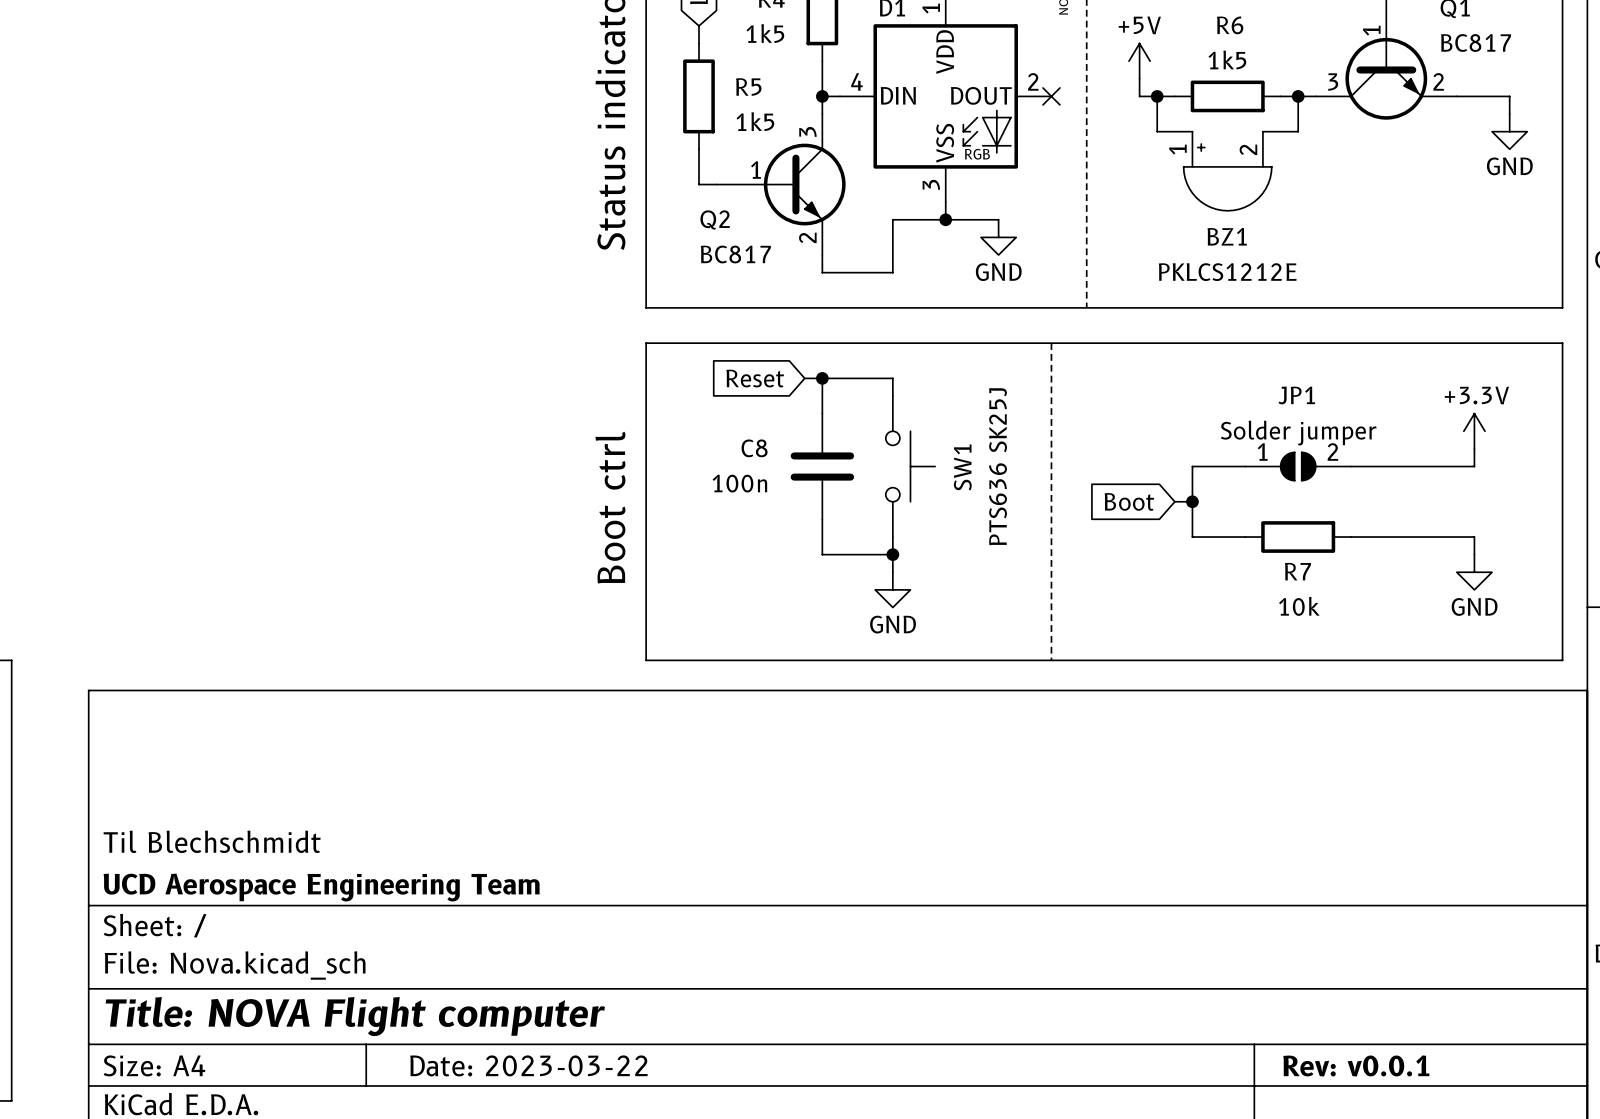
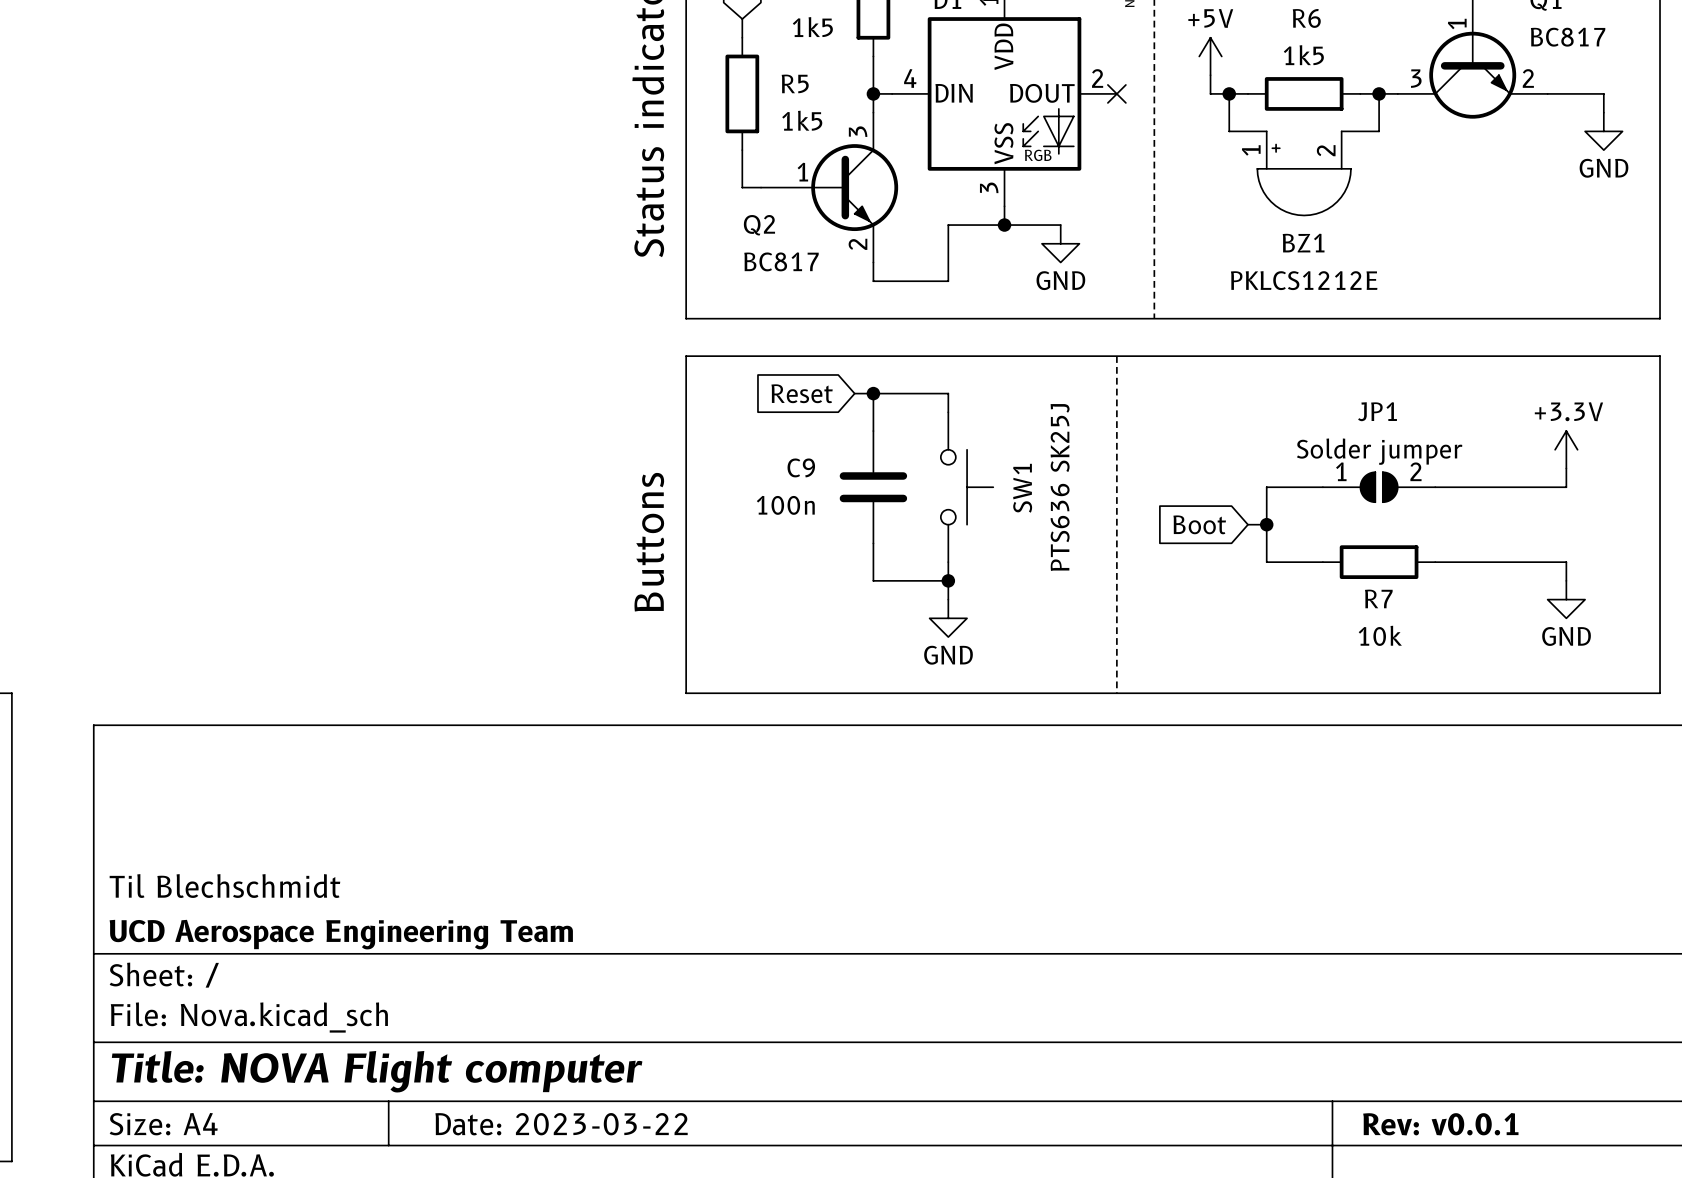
C8 name: C8 (754, 448) -> C9 (801, 467)
text: Boot ctrl (610, 507) -> Buttons (649, 542)

